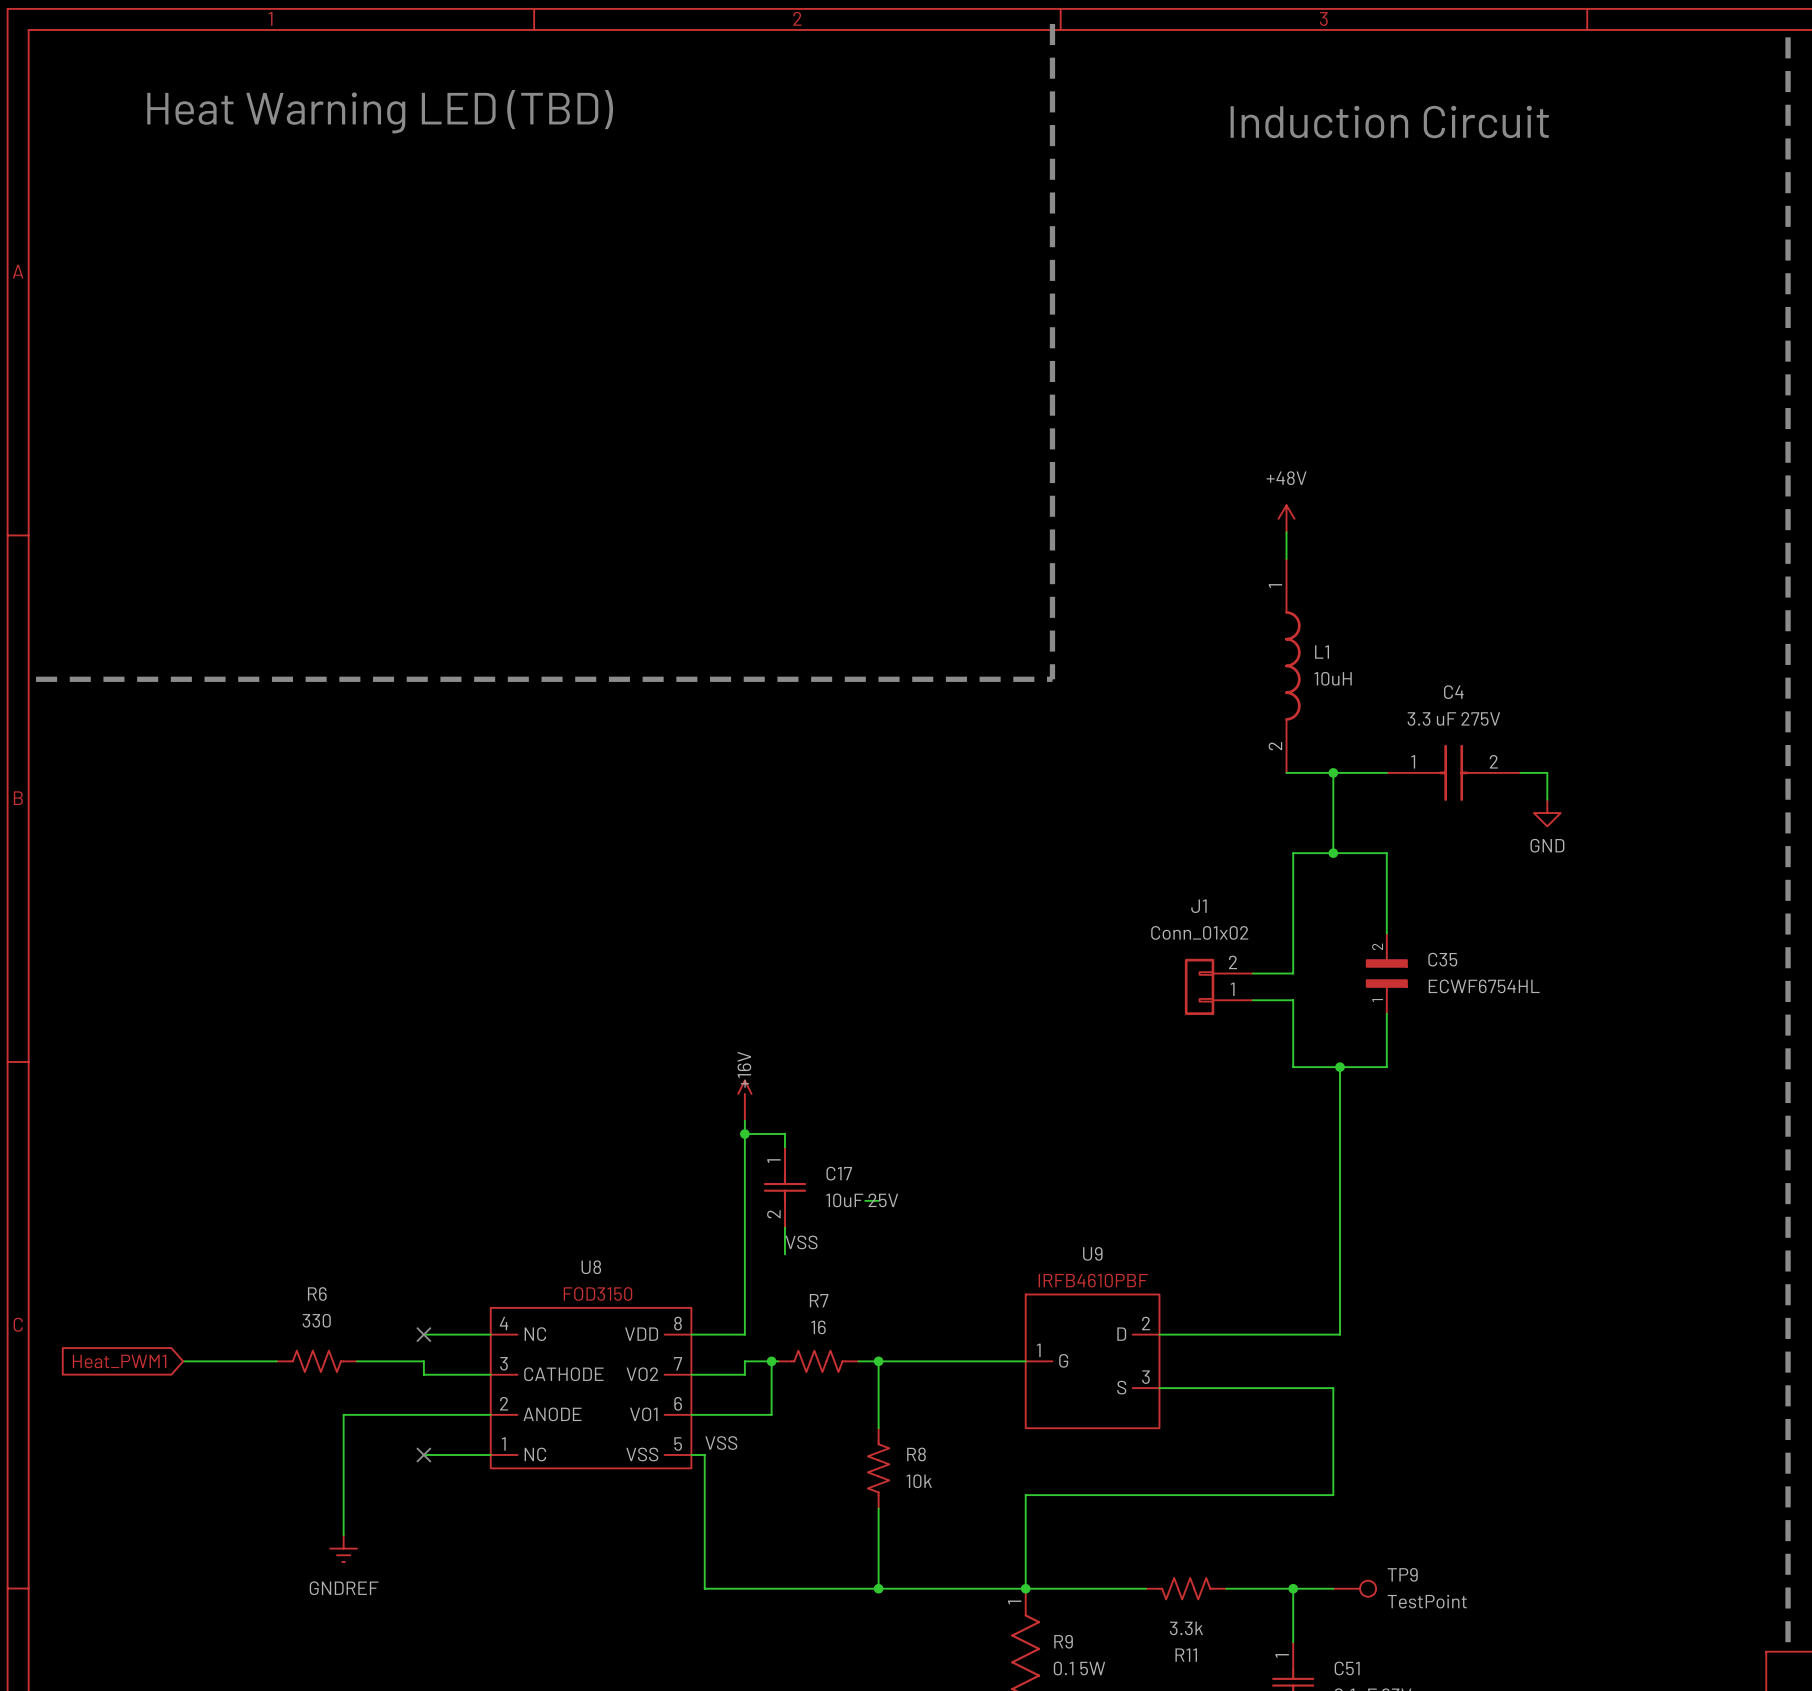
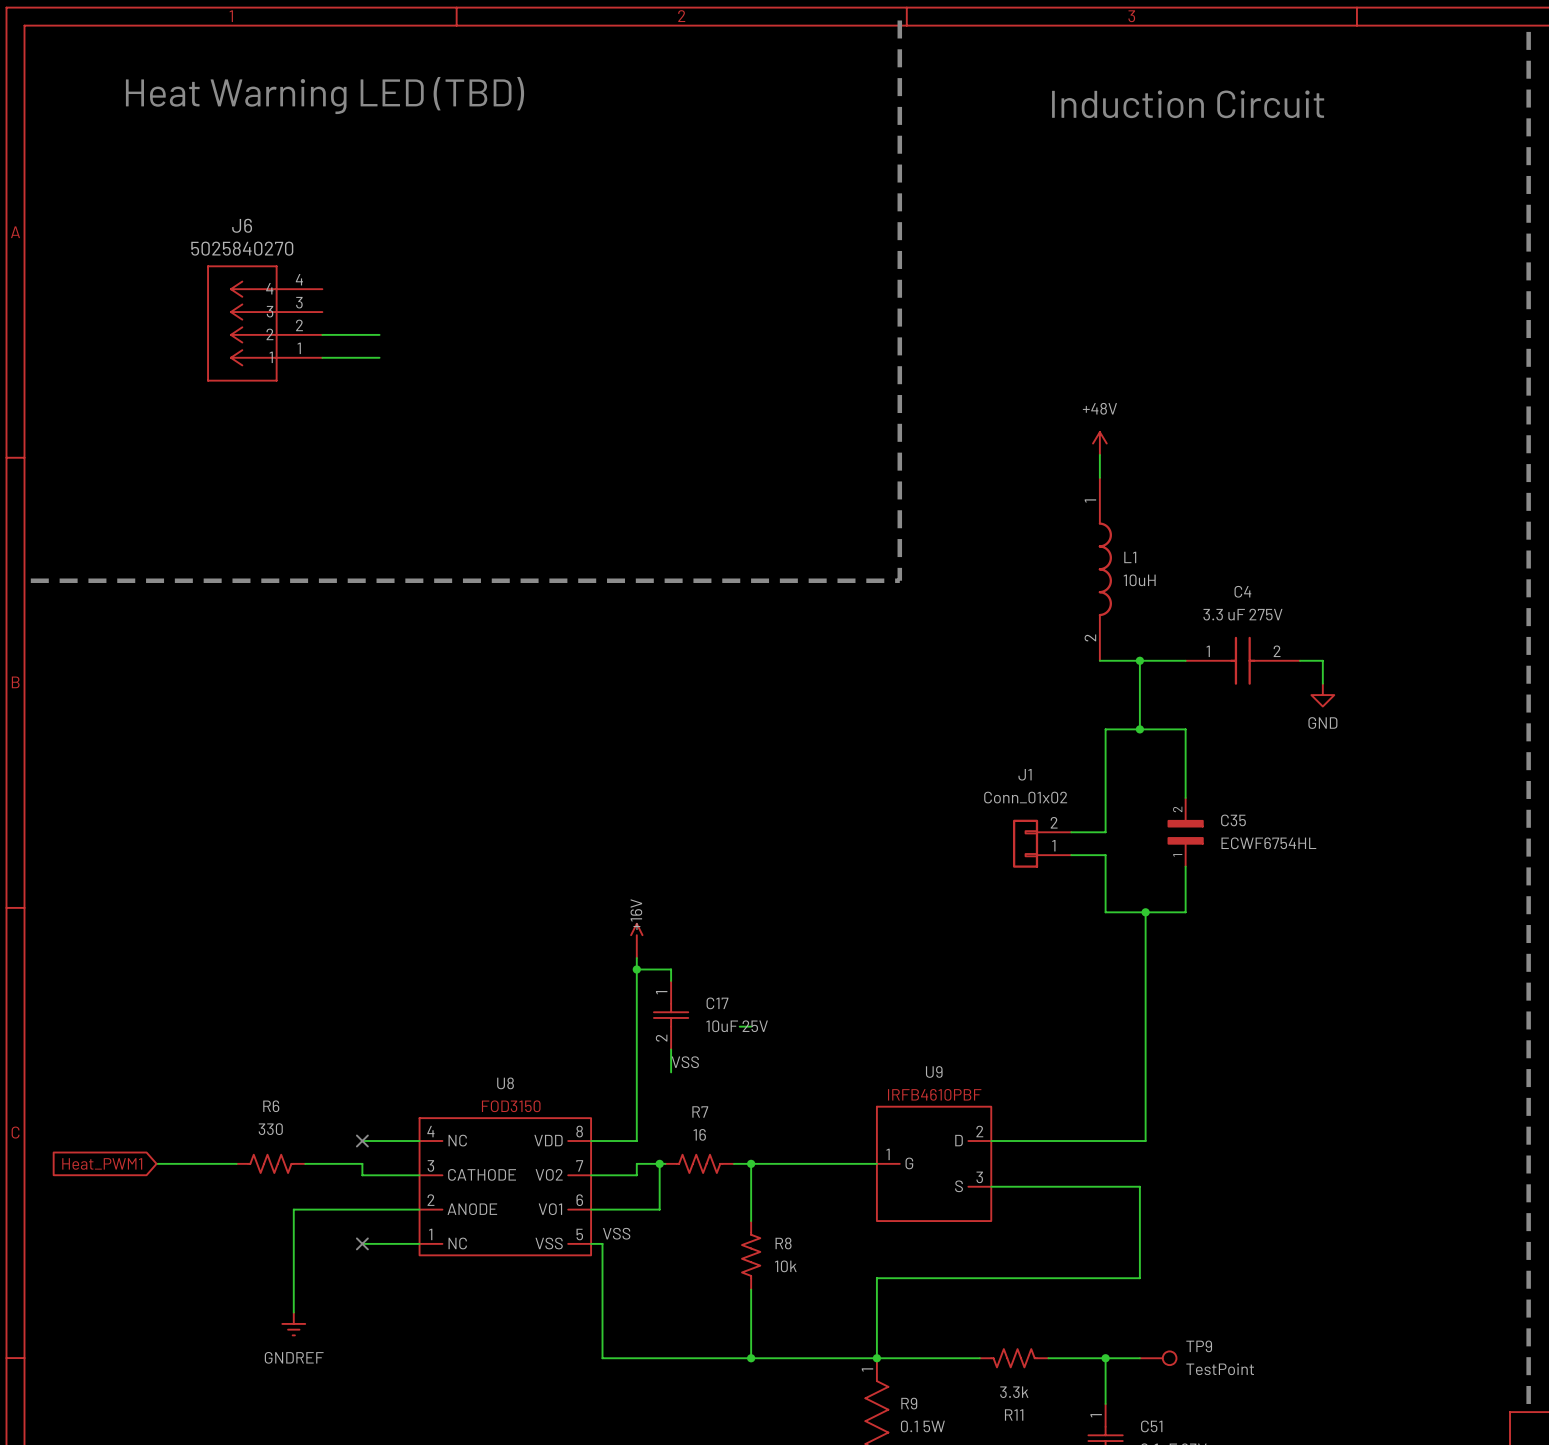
J6: none -> 5025840270 (264, 323)
wire: none -> (322, 334) (379, 334)
wire: none -> (322, 357) (379, 357)

